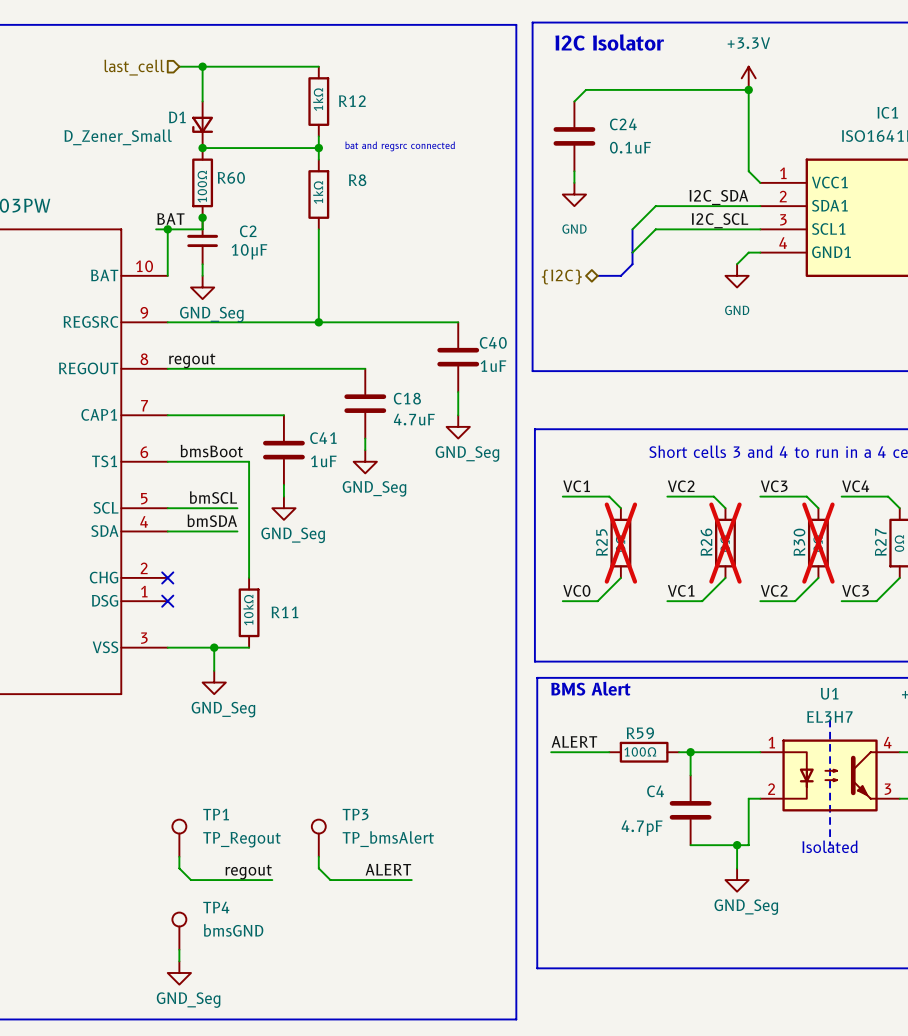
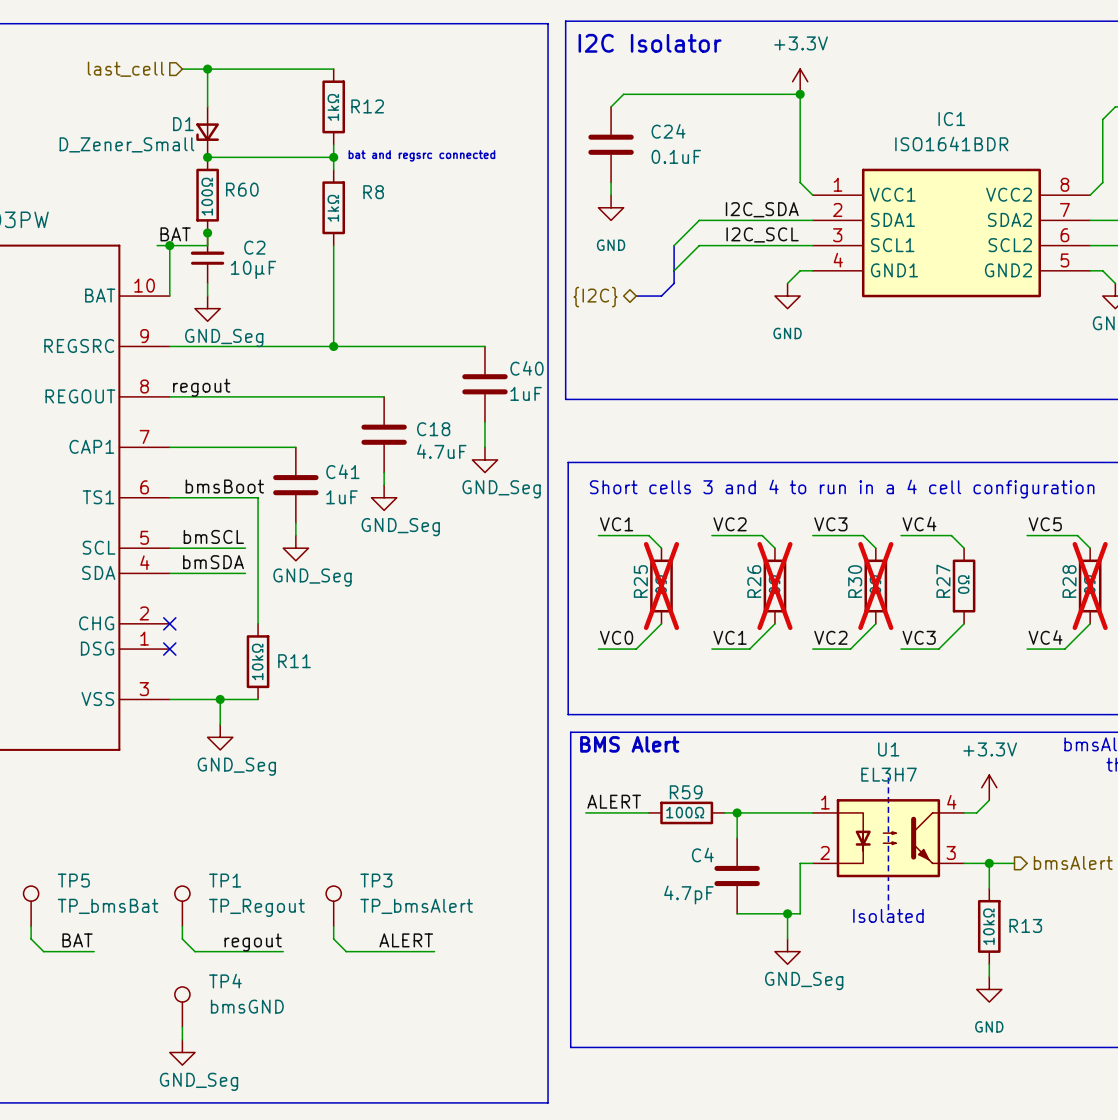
TP5: none -> TP_bmsBat (31, 906)
wire: none -> (31, 926) (31, 939) (43, 951) (94, 951)
label: none -> BAT (77, 940)

